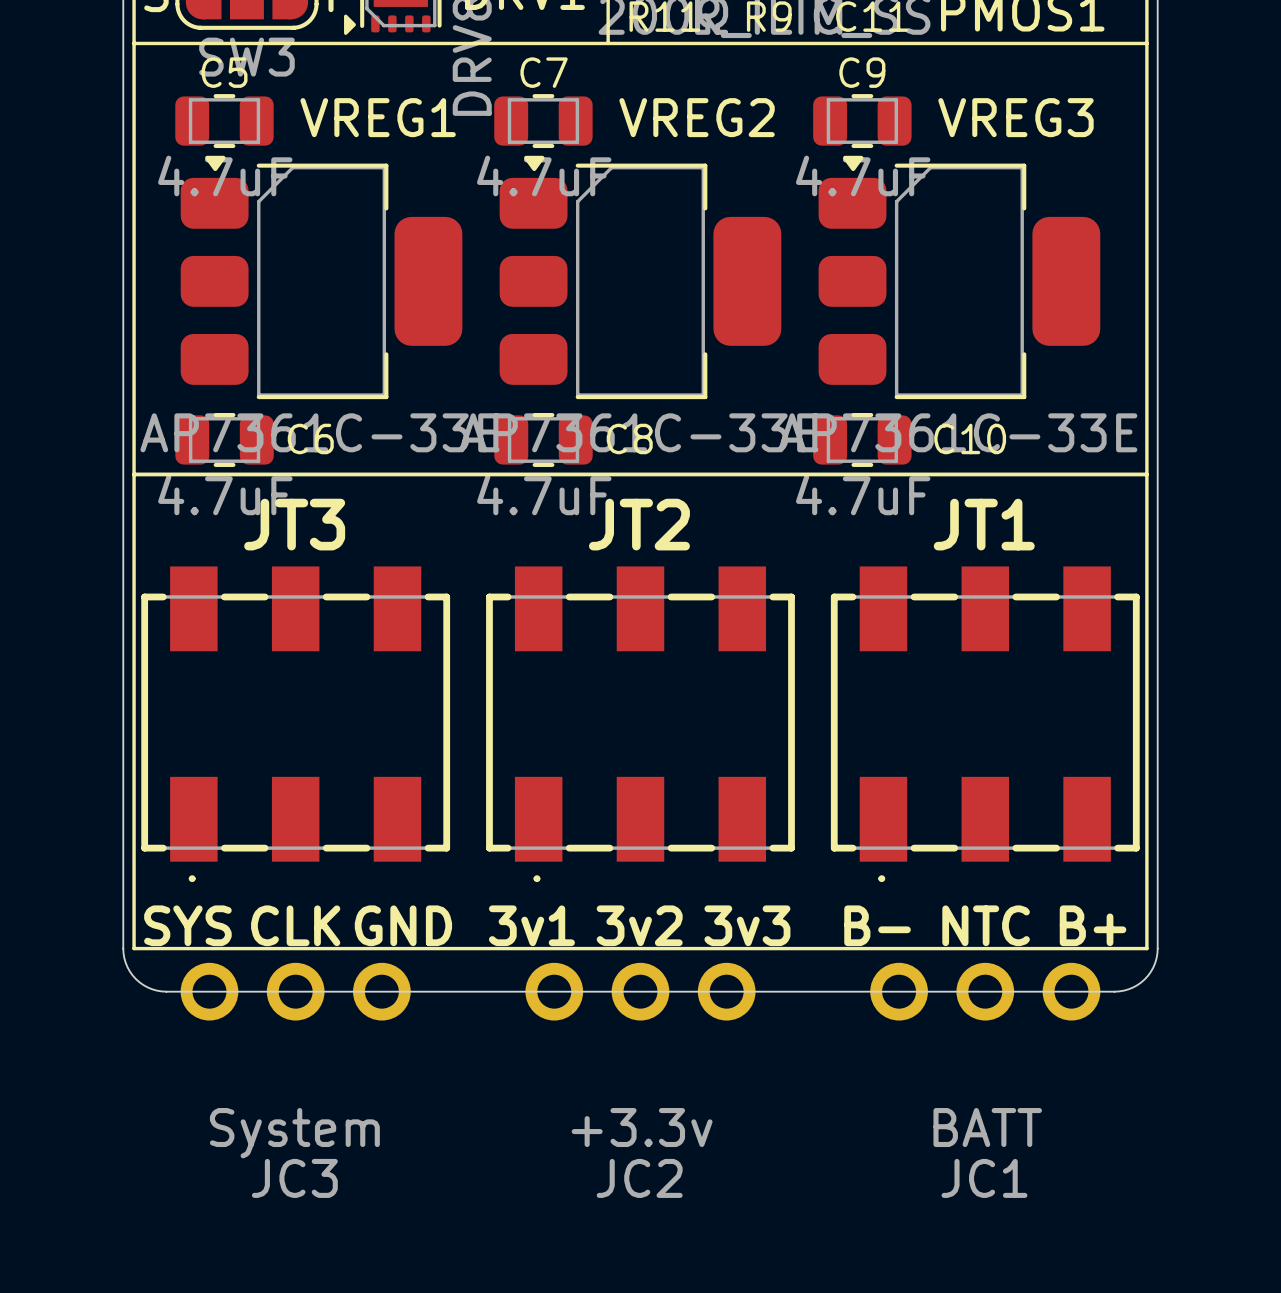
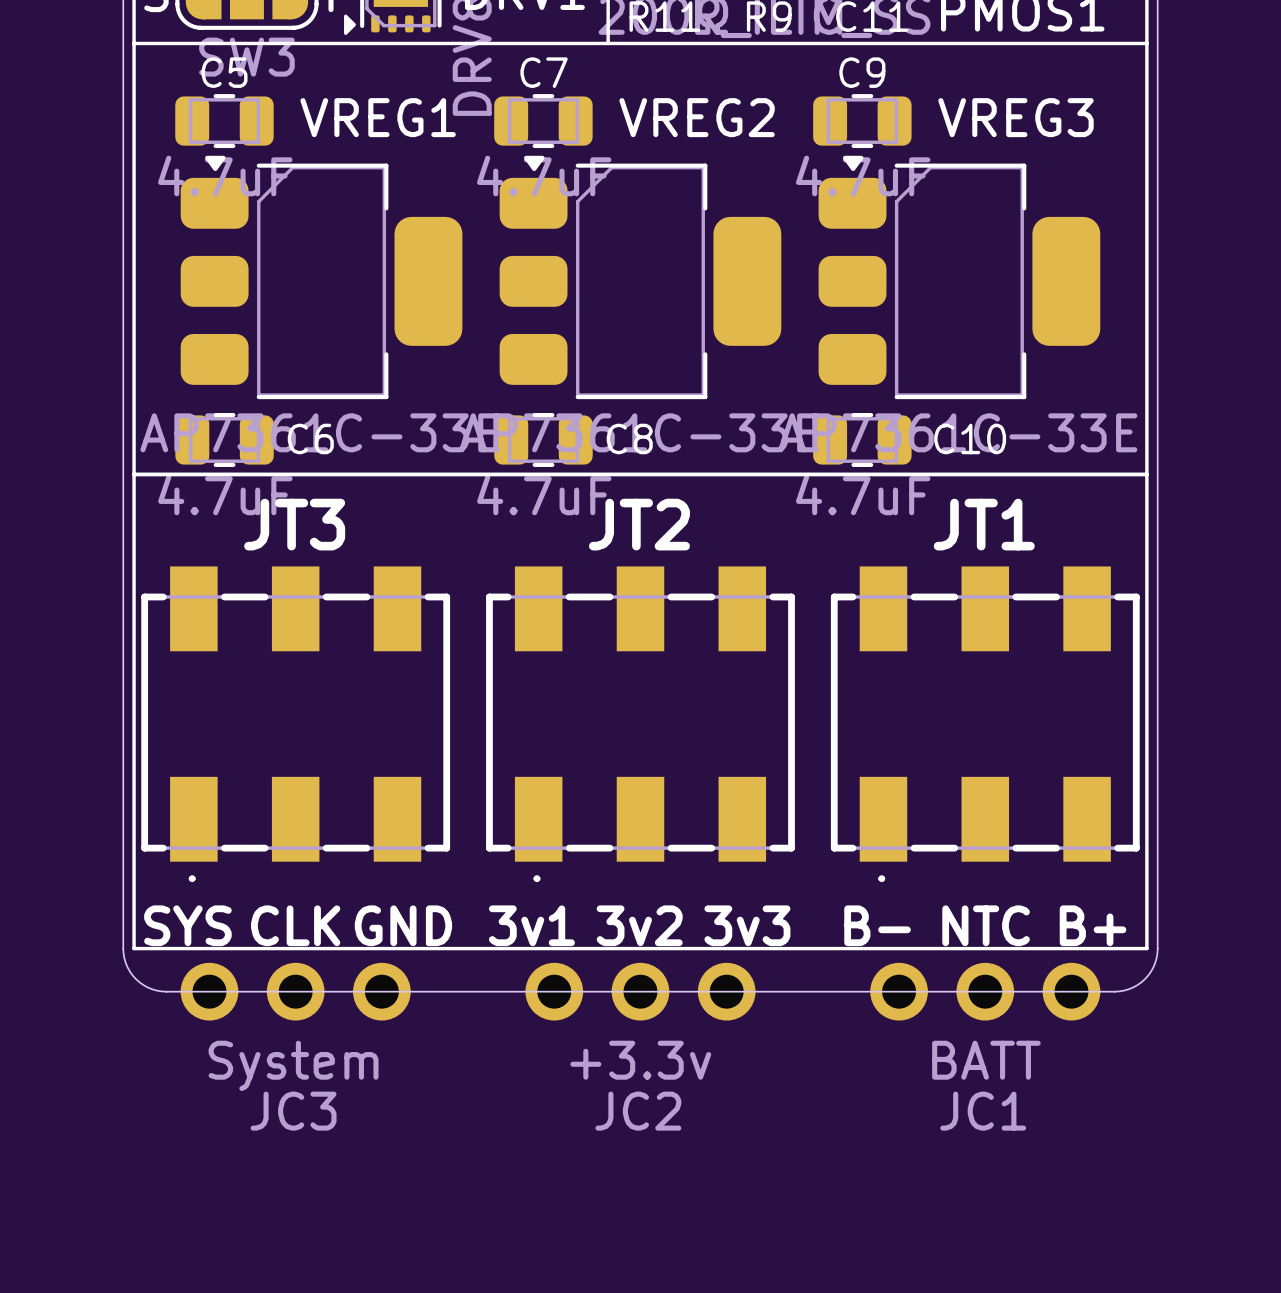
JC2 value position: +3.3v (642, 1127) -> +3.3v (640, 1060)
JC1 value position: BATT (987, 1127) -> BATT (986, 1060)
JC3 value position: System (294, 1133) -> System (293, 1065)
JC3 name position: JC3 (294, 1178) -> JC3 (293, 1111)
JC2 name position: JC2 (639, 1178) -> JC2 (638, 1111)
JC1 name position: JC1 (984, 1178) -> JC1 (983, 1111)

